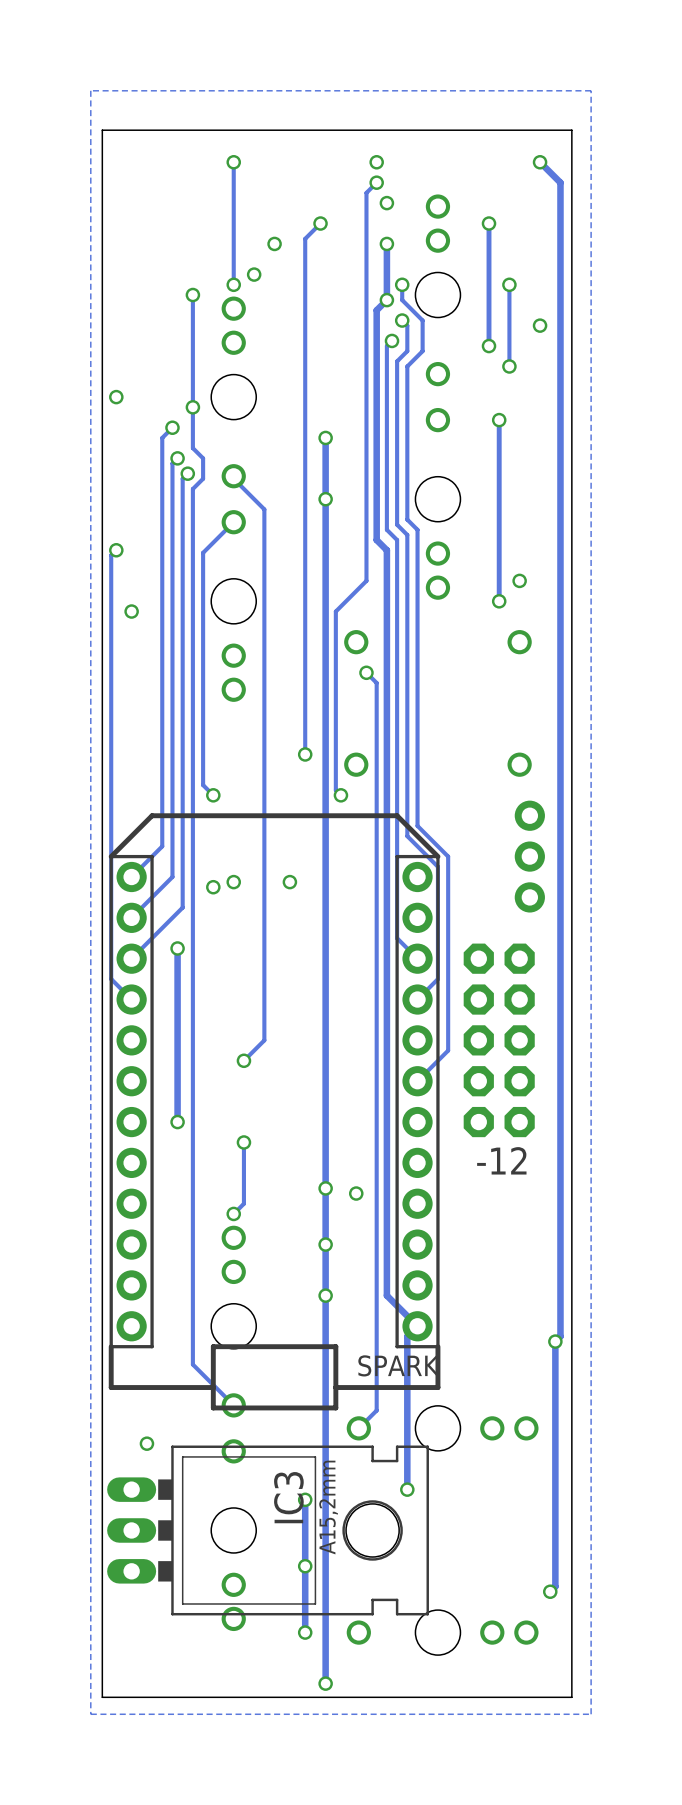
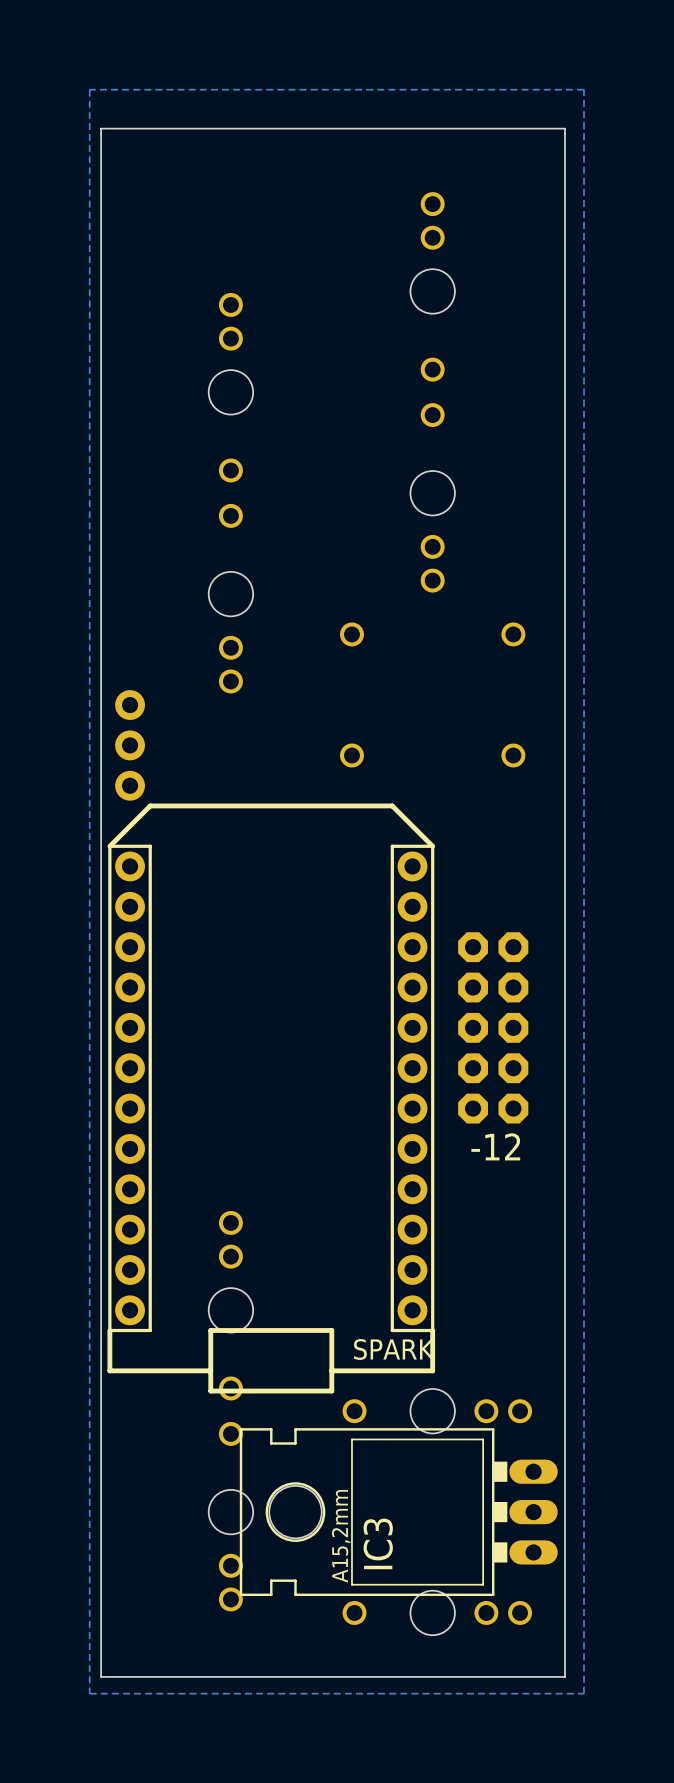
track: (233, 162) (233, 284) -> none
via: (233, 162) -> none
via: (376, 162) -> none
track: (540, 162) (560, 182) (560, 1336) (555, 1341) (555, 1586) (550, 1591) -> none
via: (540, 162) -> none
track: (376, 182) (366, 192) (366, 580) (335, 611) (335, 790) (340, 795) -> none
via: (376, 182) -> none
via: (386, 203) -> none
track: (320, 223) (305, 238) (305, 754) -> none
via: (320, 223) -> none
track: (489, 223) (489, 346) -> none
via: (489, 223) -> none
via: (274, 243) -> none
track: (386, 243) (386, 300) (376, 310) (376, 540) (386, 550) (386, 1295) (417, 1326) (407, 1336) (407, 1489) -> none
via: (386, 243) -> none
via: (254, 274) -> none
via: (233, 284) -> none
track: (402, 284) (402, 300) (422, 320) (422, 351) (407, 366) (407, 519) (417, 529) (417, 825) (448, 856) (448, 1050) (417, 1081) -> none
via: (402, 284) -> none
track: (509, 284) (509, 366) -> none
via: (509, 284) -> none
track: (192, 295) (192, 448) (203, 458) (203, 478) (192, 489) (192, 1364) (233, 1405) -> none
via: (192, 295) -> none
via: (386, 300) -> none
track: (402, 320) (407, 325) (407, 351) (397, 361) (397, 524) (407, 534) (407, 836) (437, 866) (437, 979) (417, 999) -> none
via: (402, 320) -> none
via: (540, 325) -> none
track: (392, 340) (386, 346) (386, 529) (397, 540) (397, 938) (417, 958) -> none
via: (392, 340) -> none
via: (489, 346) -> none
via: (509, 366) -> none
via: (116, 397) -> none
via: (192, 407) -> none
track: (499, 420) (499, 601) -> none
via: (499, 420) -> none
track: (172, 427) (162, 437) (162, 846) (131, 877) -> none
via: (172, 427) -> none
track: (325, 437) (325, 1683) -> none
via: (325, 437) -> none
track: (177, 458) (172, 463) (172, 877) (131, 917) -> none
via: (177, 458) -> none
track: (187, 473) (182, 478) (182, 907) (131, 958) -> none
via: (187, 473) -> none
track: (233, 476) (233, 478) (264, 509) (264, 1040) (243, 1060) -> none
via: (325, 499) -> none
track: (233, 522) (203, 552) (203, 785) (213, 795) -> none
track: (116, 550) (111, 555) (111, 979) (131, 999) -> none
via: (116, 550) -> none
via: (519, 580) -> none
via: (499, 601) -> none
via: (131, 611) -> none
track: (366, 672) (376, 683) (376, 1410) (358, 1428) -> none
via: (366, 672) -> none
part: none -> (130, 745)
via: (305, 754) -> none
via: (213, 795) -> none
via: (340, 795) -> none
part: (529, 856) -> none
via: (233, 882) -> none
via: (289, 882) -> none
via: (213, 887) -> none
track: (177, 948) (177, 1122) -> none
via: (177, 948) -> none
via: (243, 1060) -> none
via: (177, 1122) -> none
track: (243, 1142) (243, 1203) (233, 1213) -> none
via: (243, 1142) -> none
via: (325, 1188) -> none
via: (356, 1193) -> none
via: (233, 1213) -> none
via: (325, 1244) -> none
via: (325, 1295) -> none
via: (555, 1341) -> none
via: (146, 1443) -> none
IC3 footprint: [107, 1445, 429, 1616] -> [239, 1428, 558, 1597]
via: (407, 1489) -> none
IC3 name position: IC3 (288, 1497) -> IC3 (378, 1543)
track: (305, 1499) (305, 1632) -> none
via: (305, 1499) -> none
via: (305, 1566) -> none
via: (550, 1591) -> none
via: (305, 1632) -> none
via: (325, 1683) -> none

